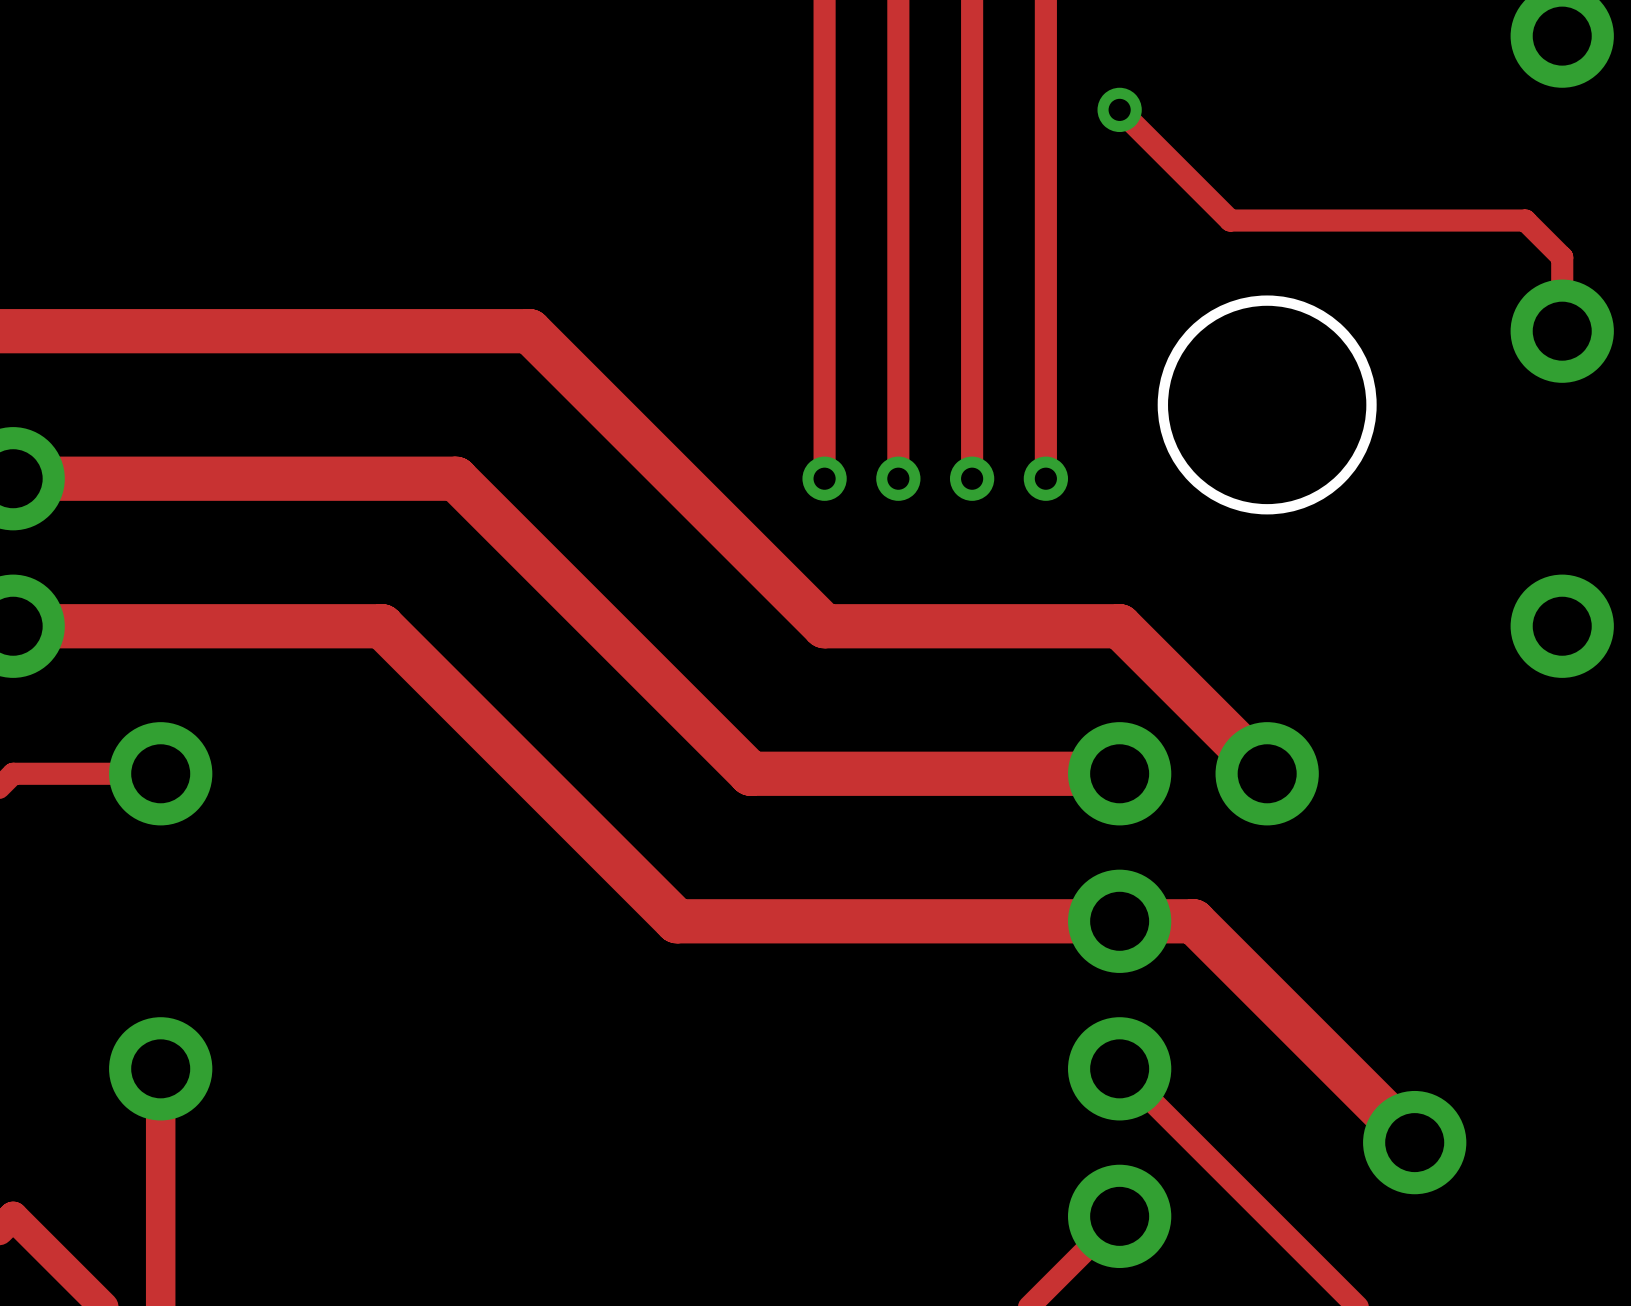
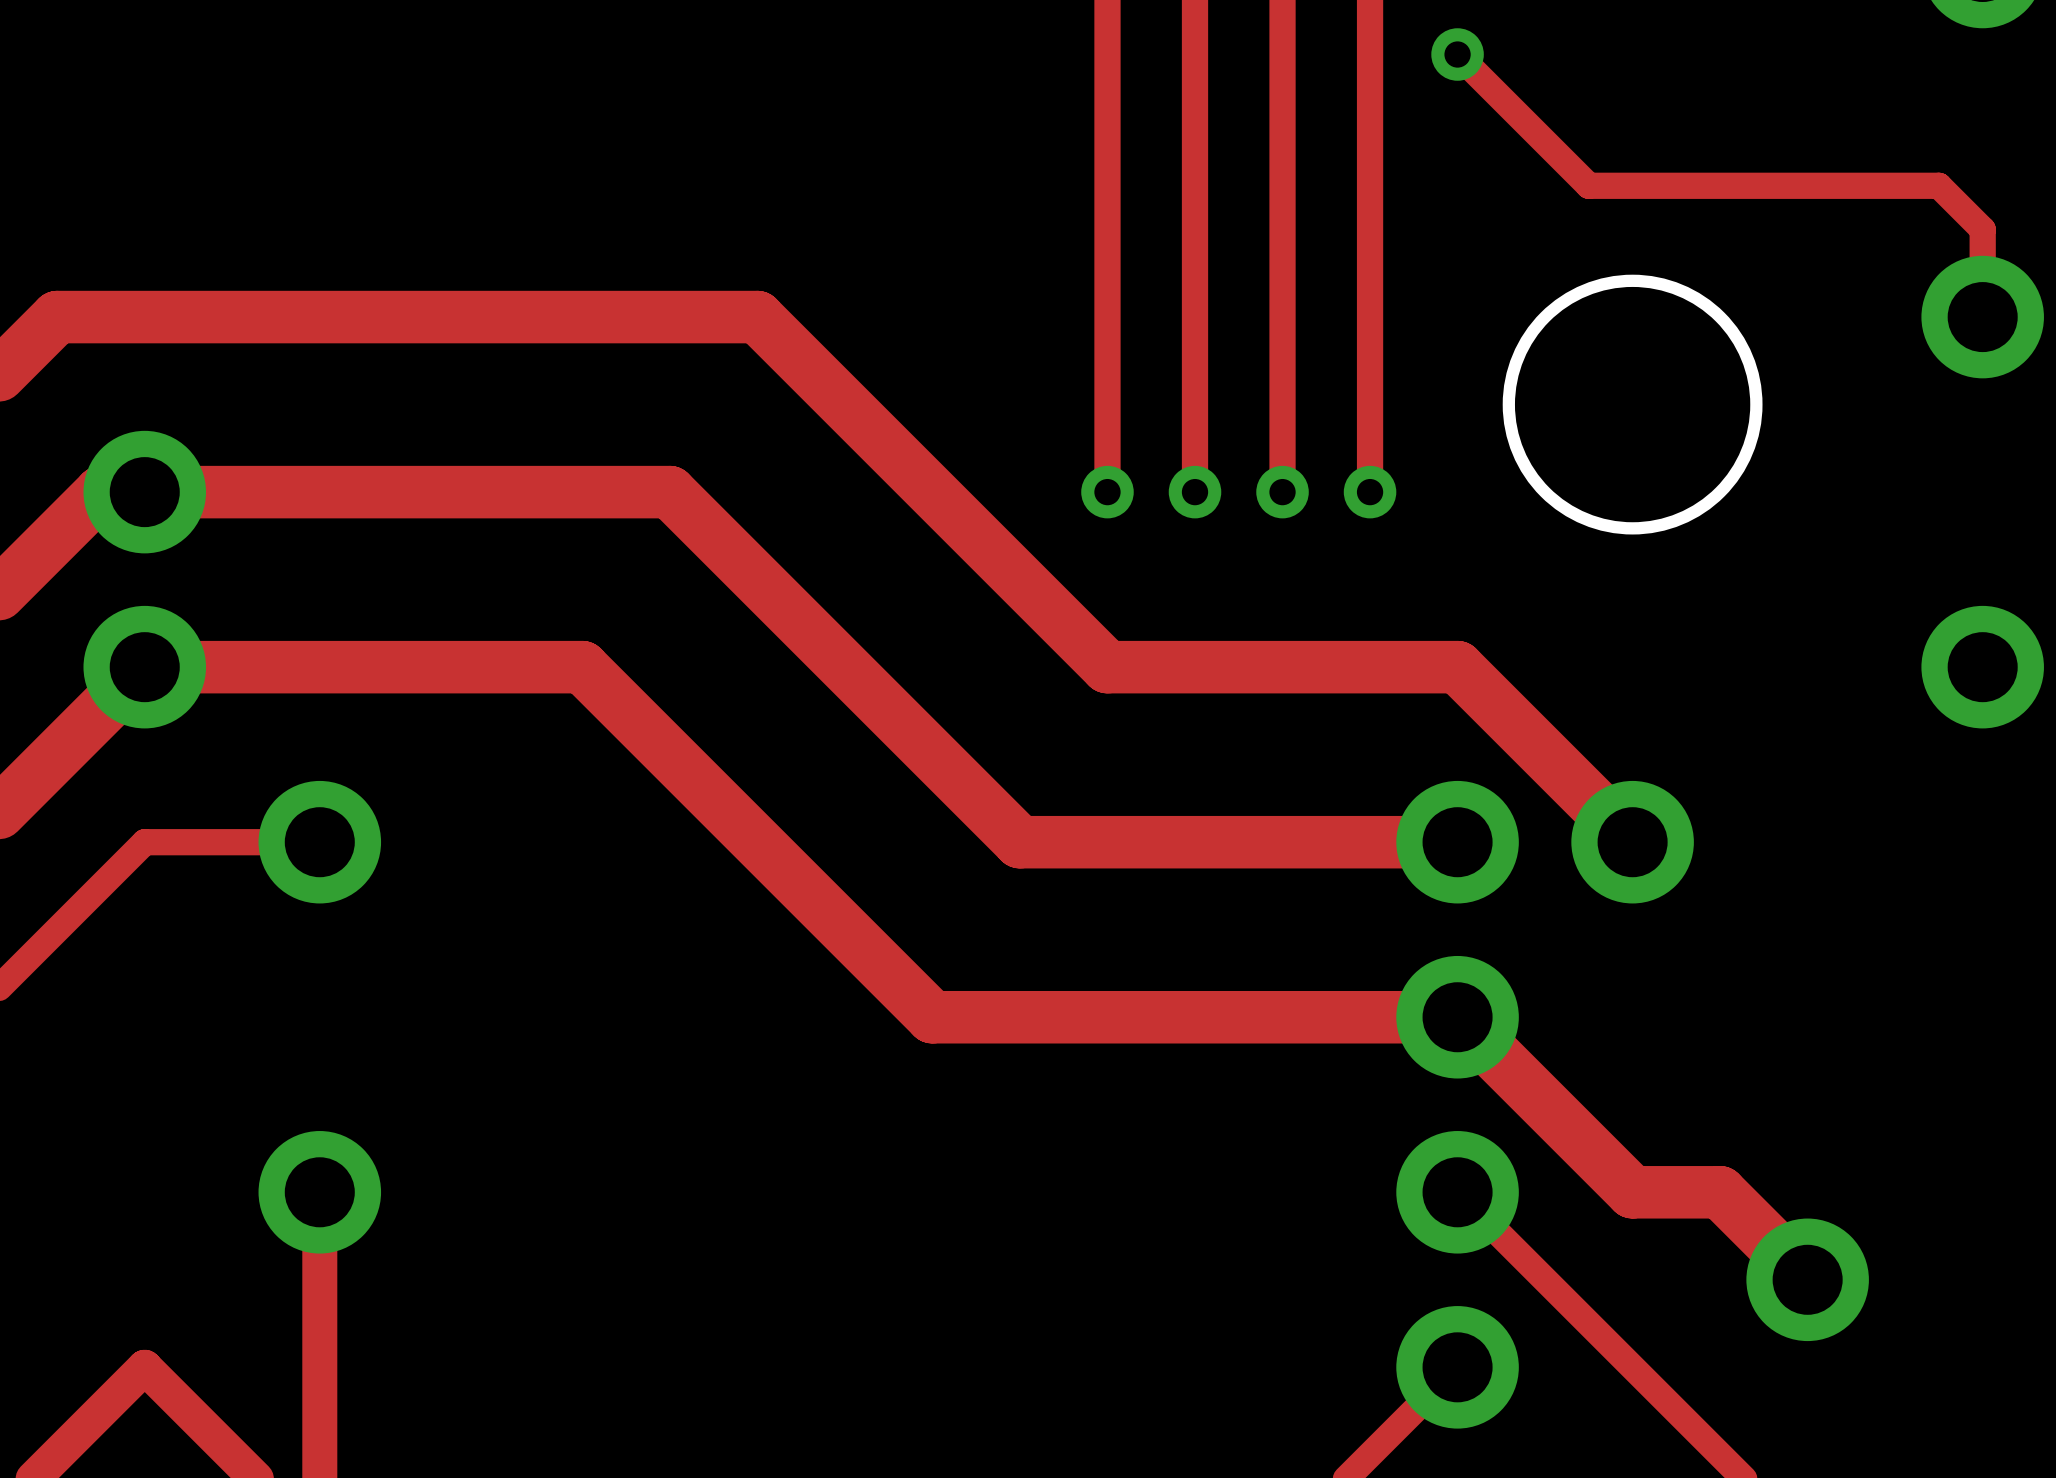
track: (1119, 921) (1193, 921) (1340, 1068) -> (1457, 1017) (1632, 1192) (1720, 1192)

